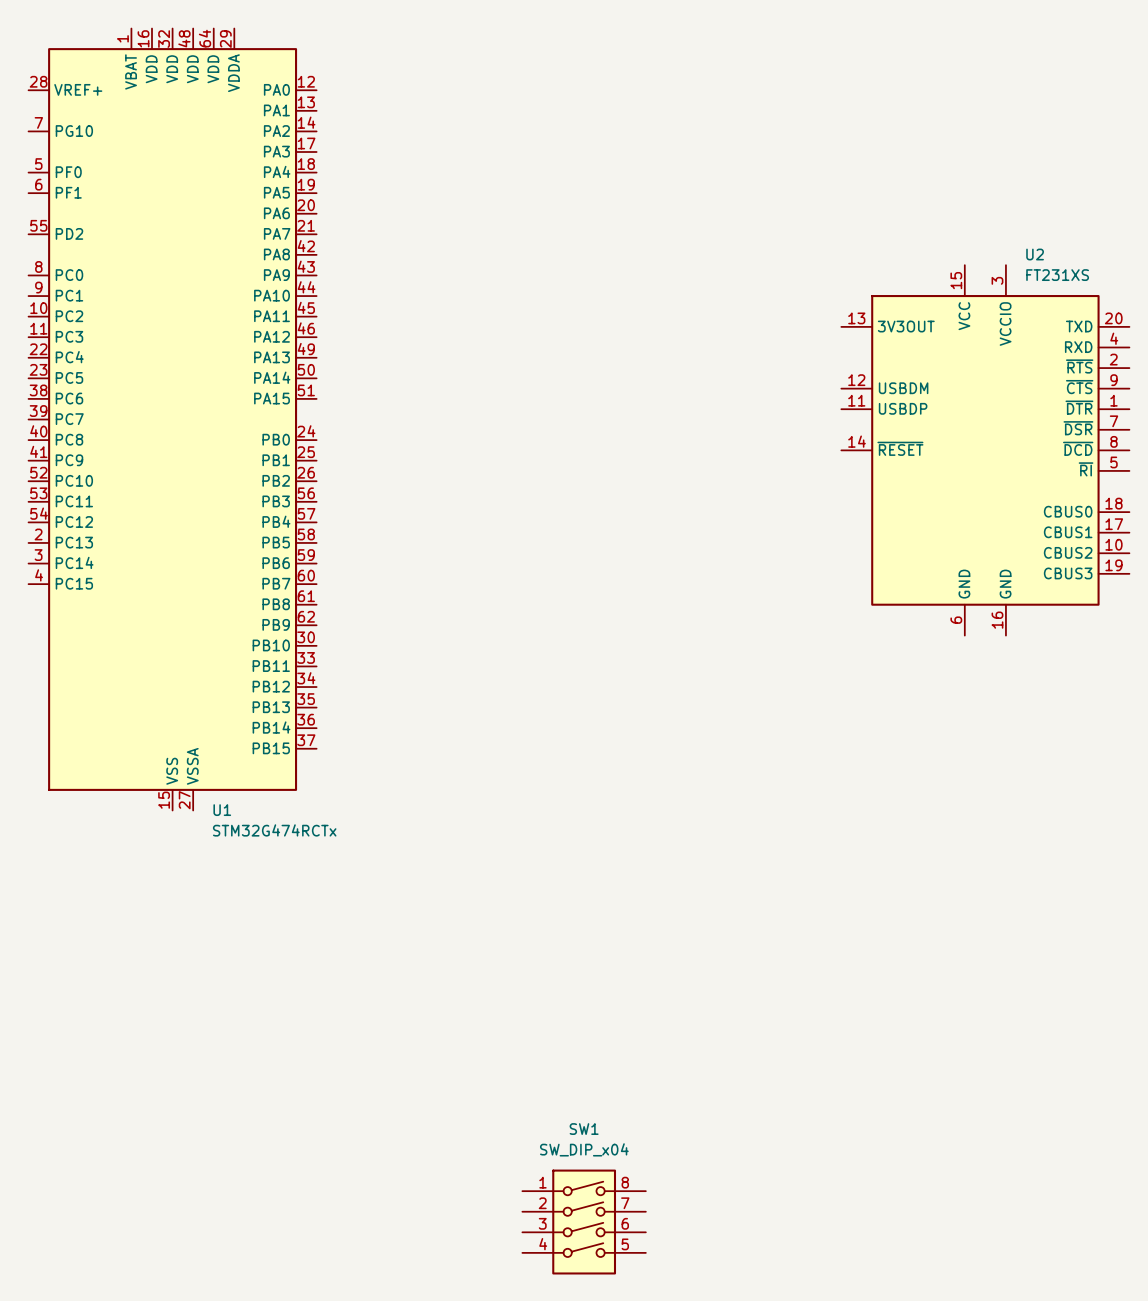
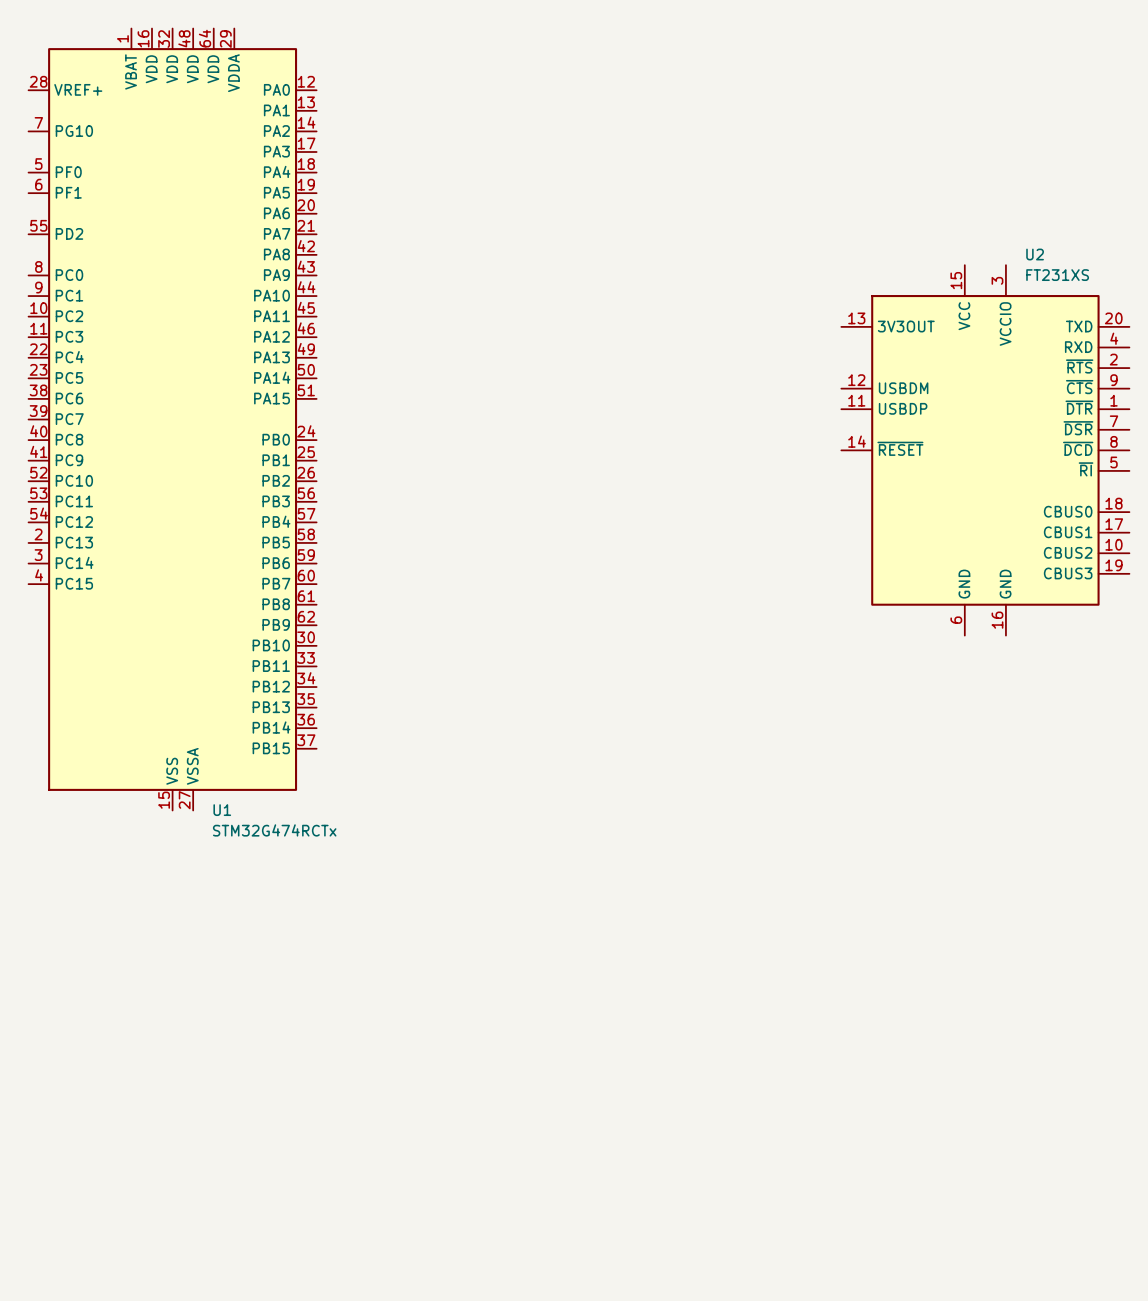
SW1: SW_DIP_x04 (584, 1222) -> none

